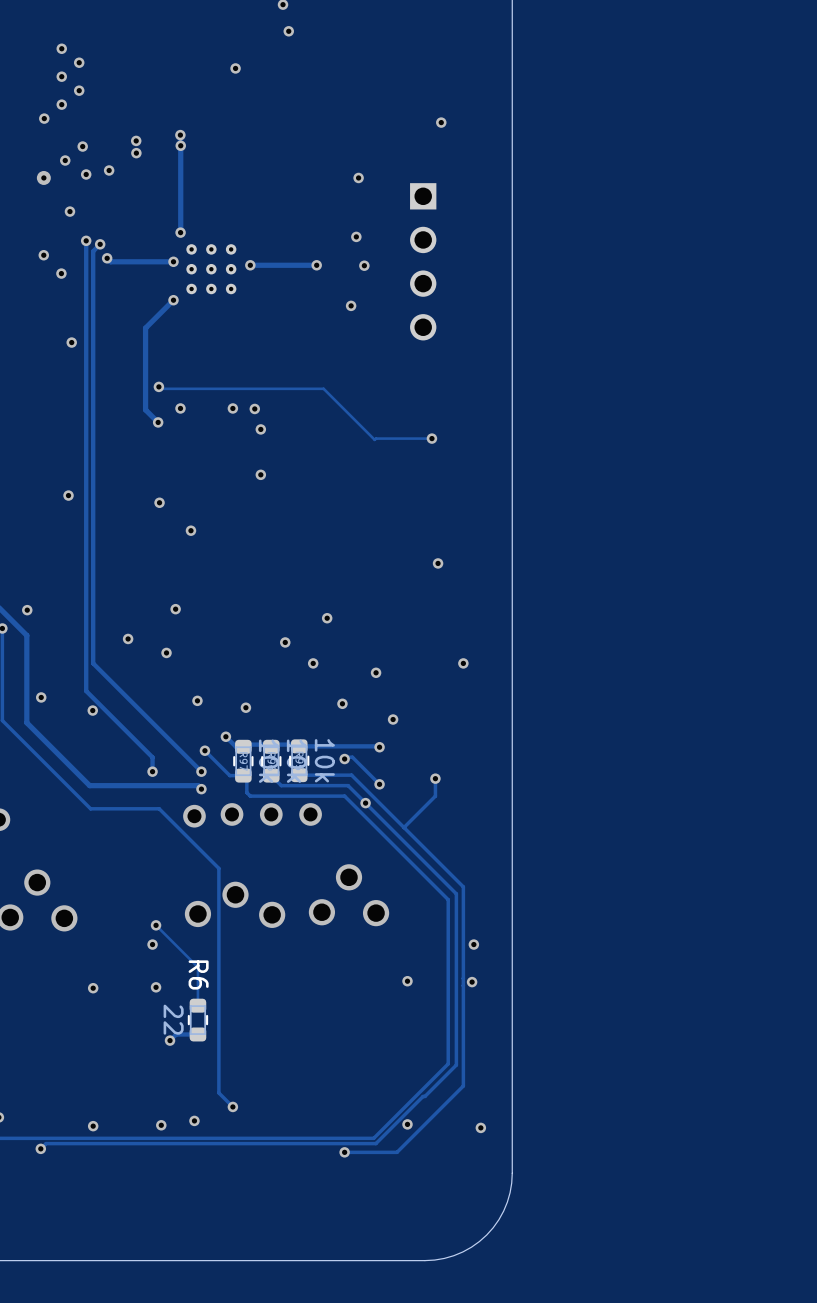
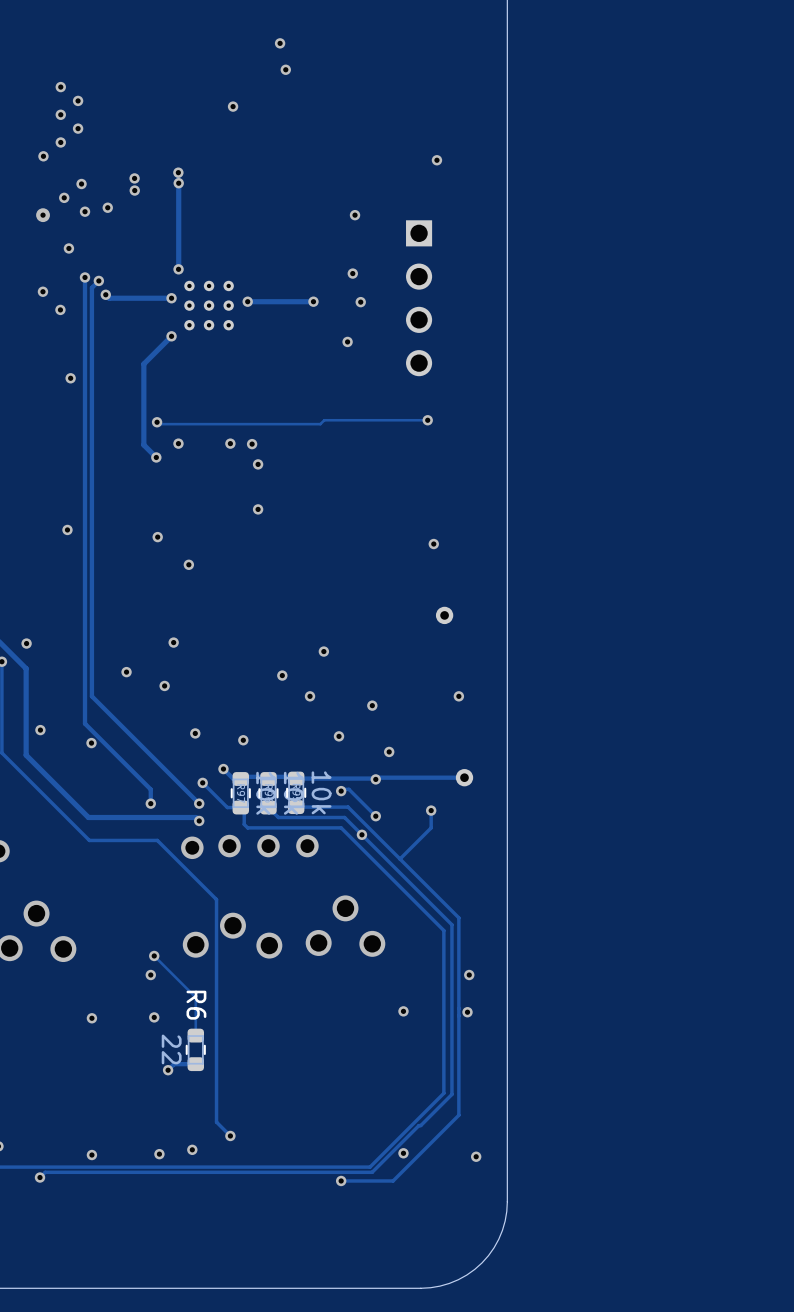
via: none -> (427, 420)
track: (323, 388) (374, 439) (431, 438) -> (320, 424) (324, 420) (427, 420)
via: (431, 438) -> none
via: none -> (433, 544)
via: (438, 563) -> none
part: none -> (444, 615)
track: none -> (464, 777) (377, 777) (375, 779)
part: none -> (464, 777)

